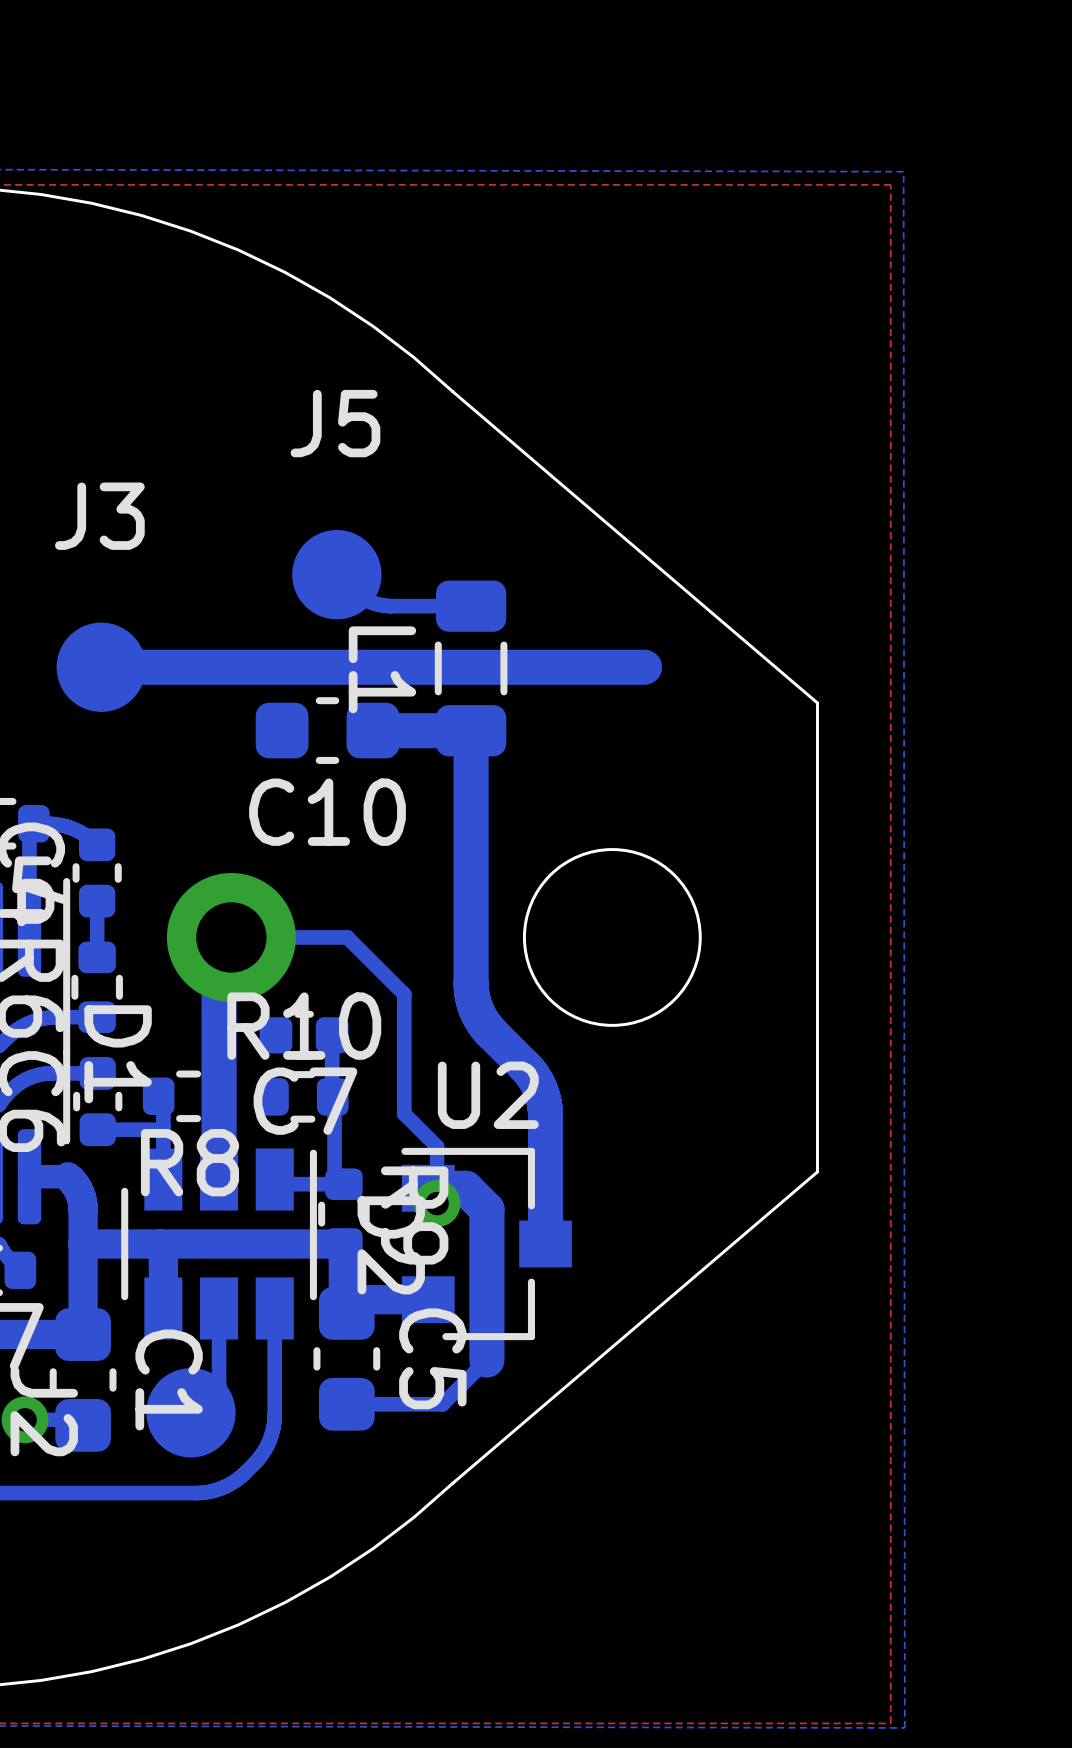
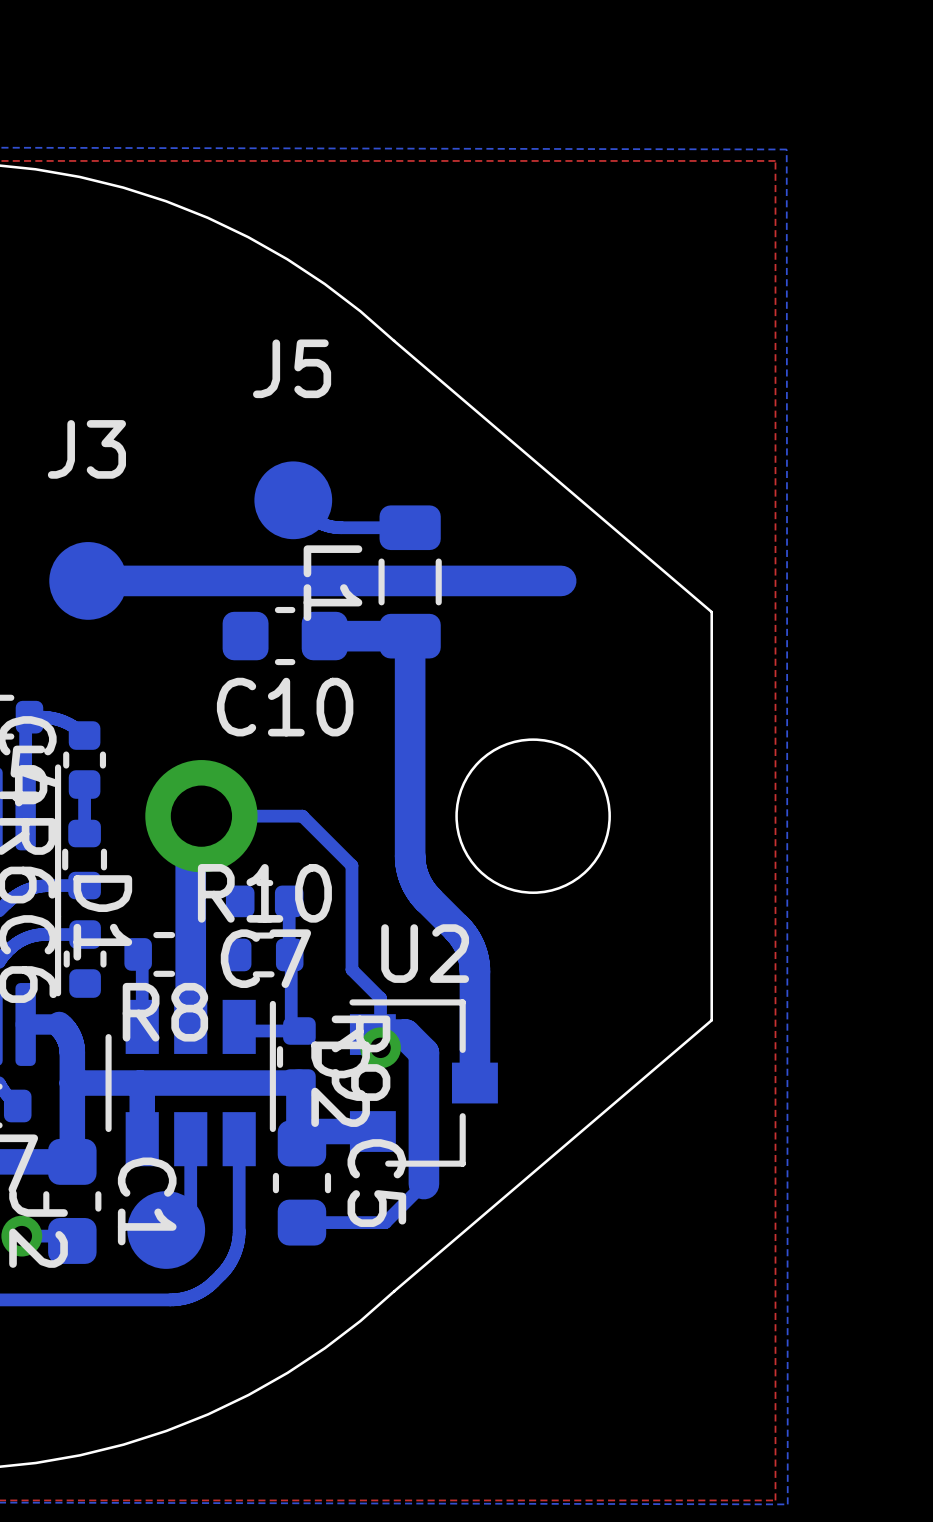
bottom track: (163, 1126) (159, 1129) (97, 1129) -> none

